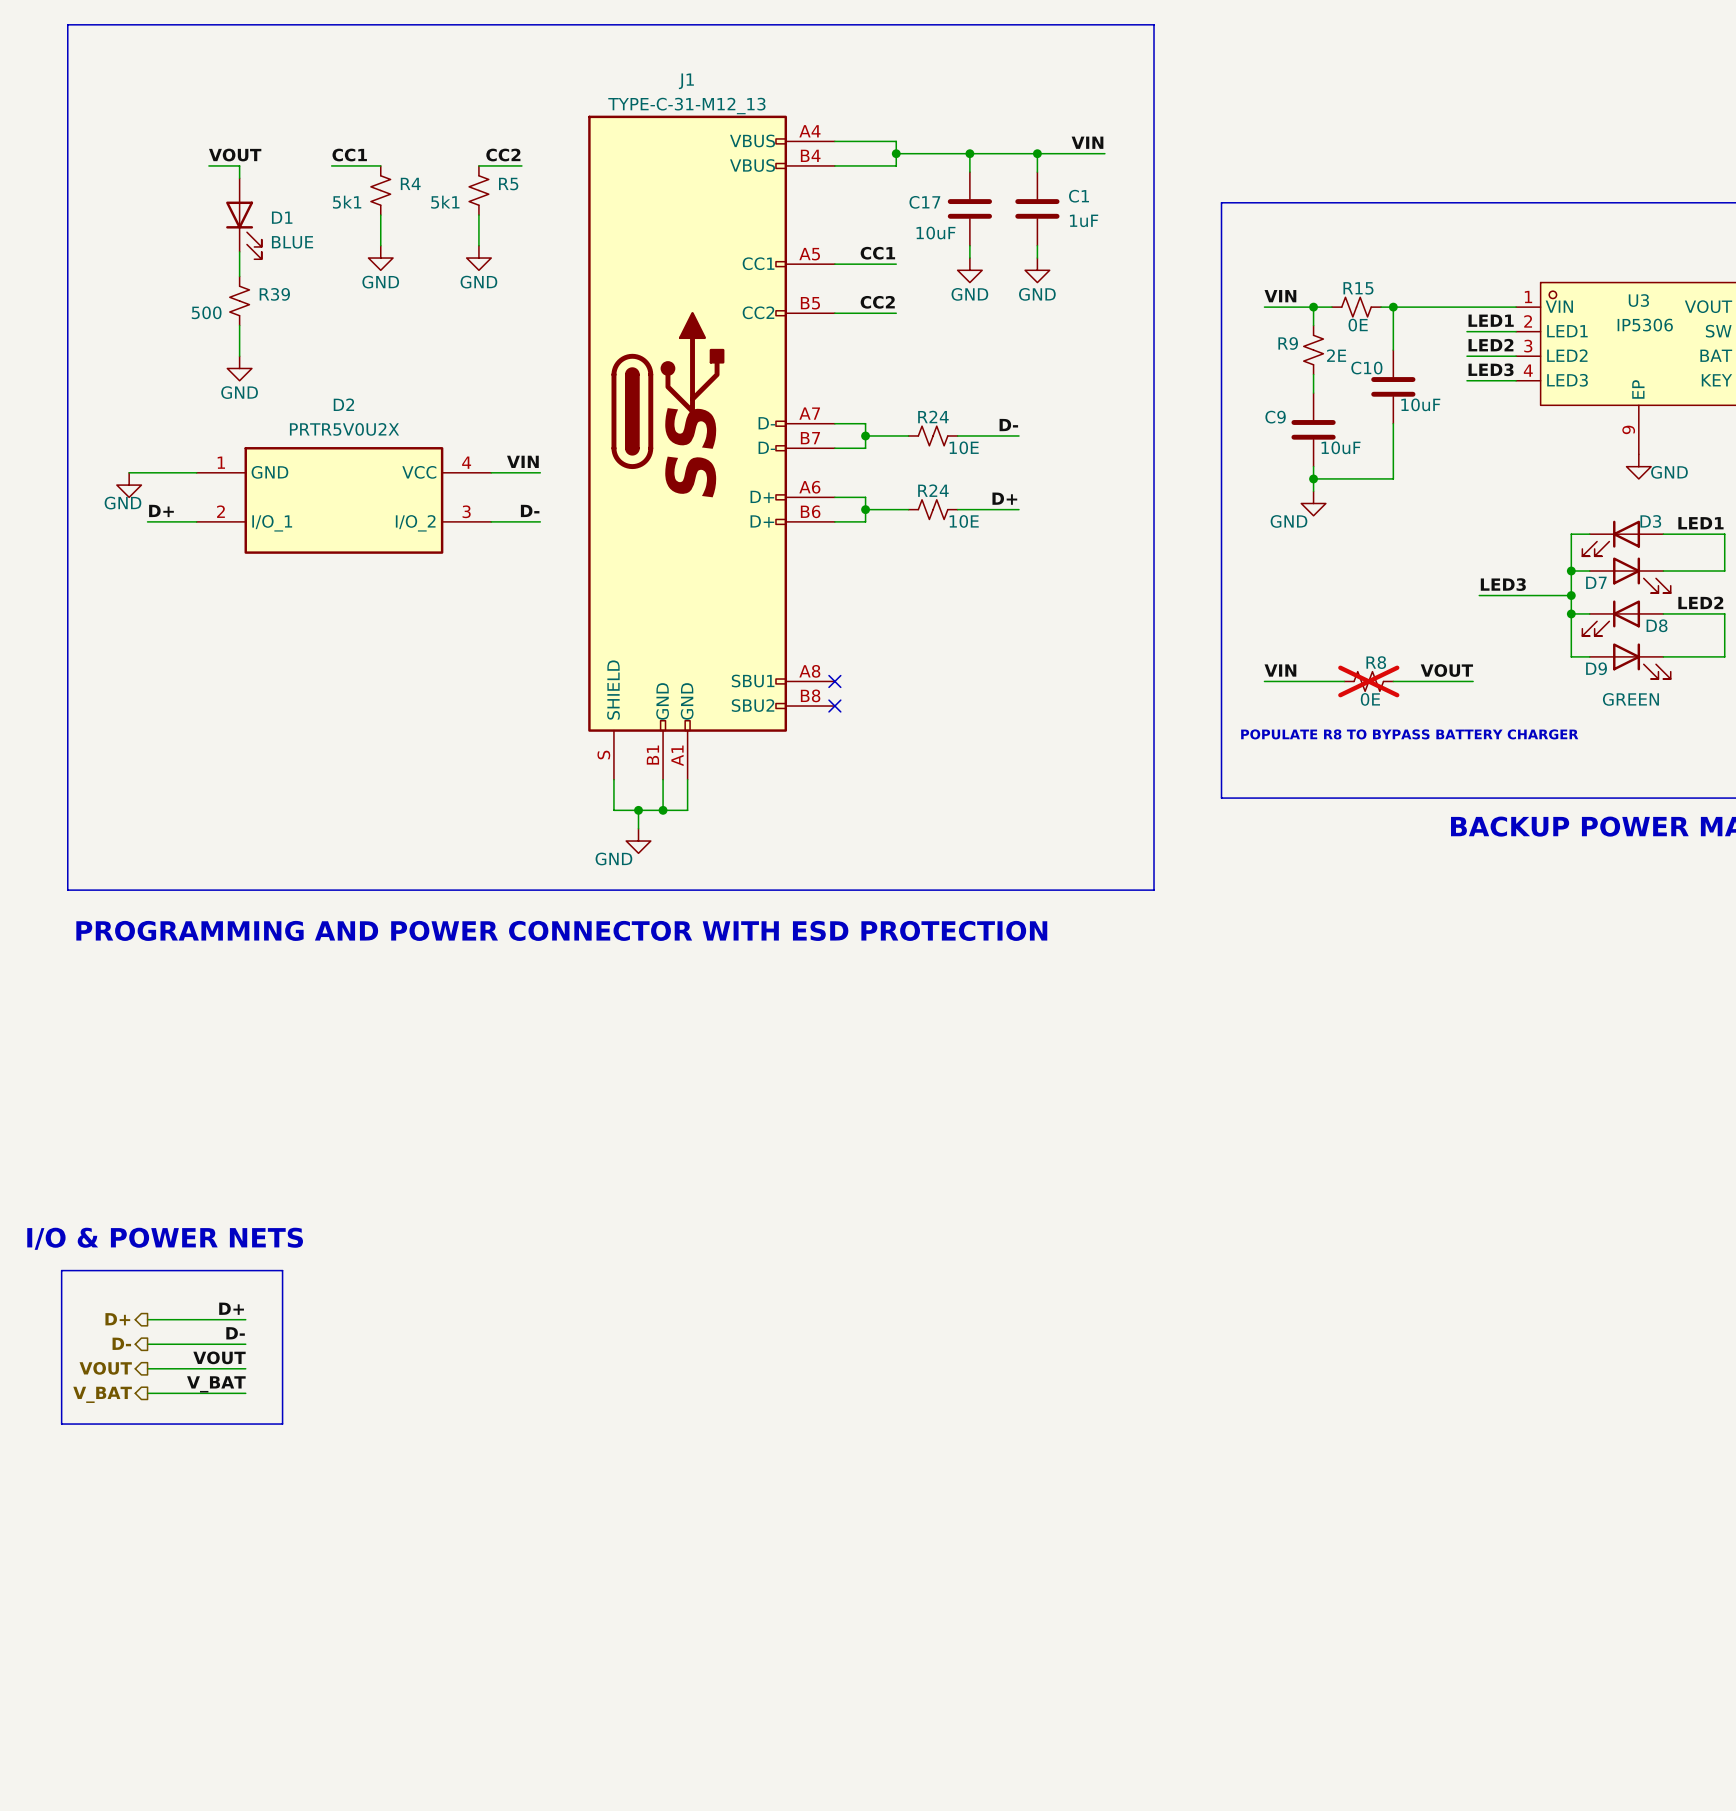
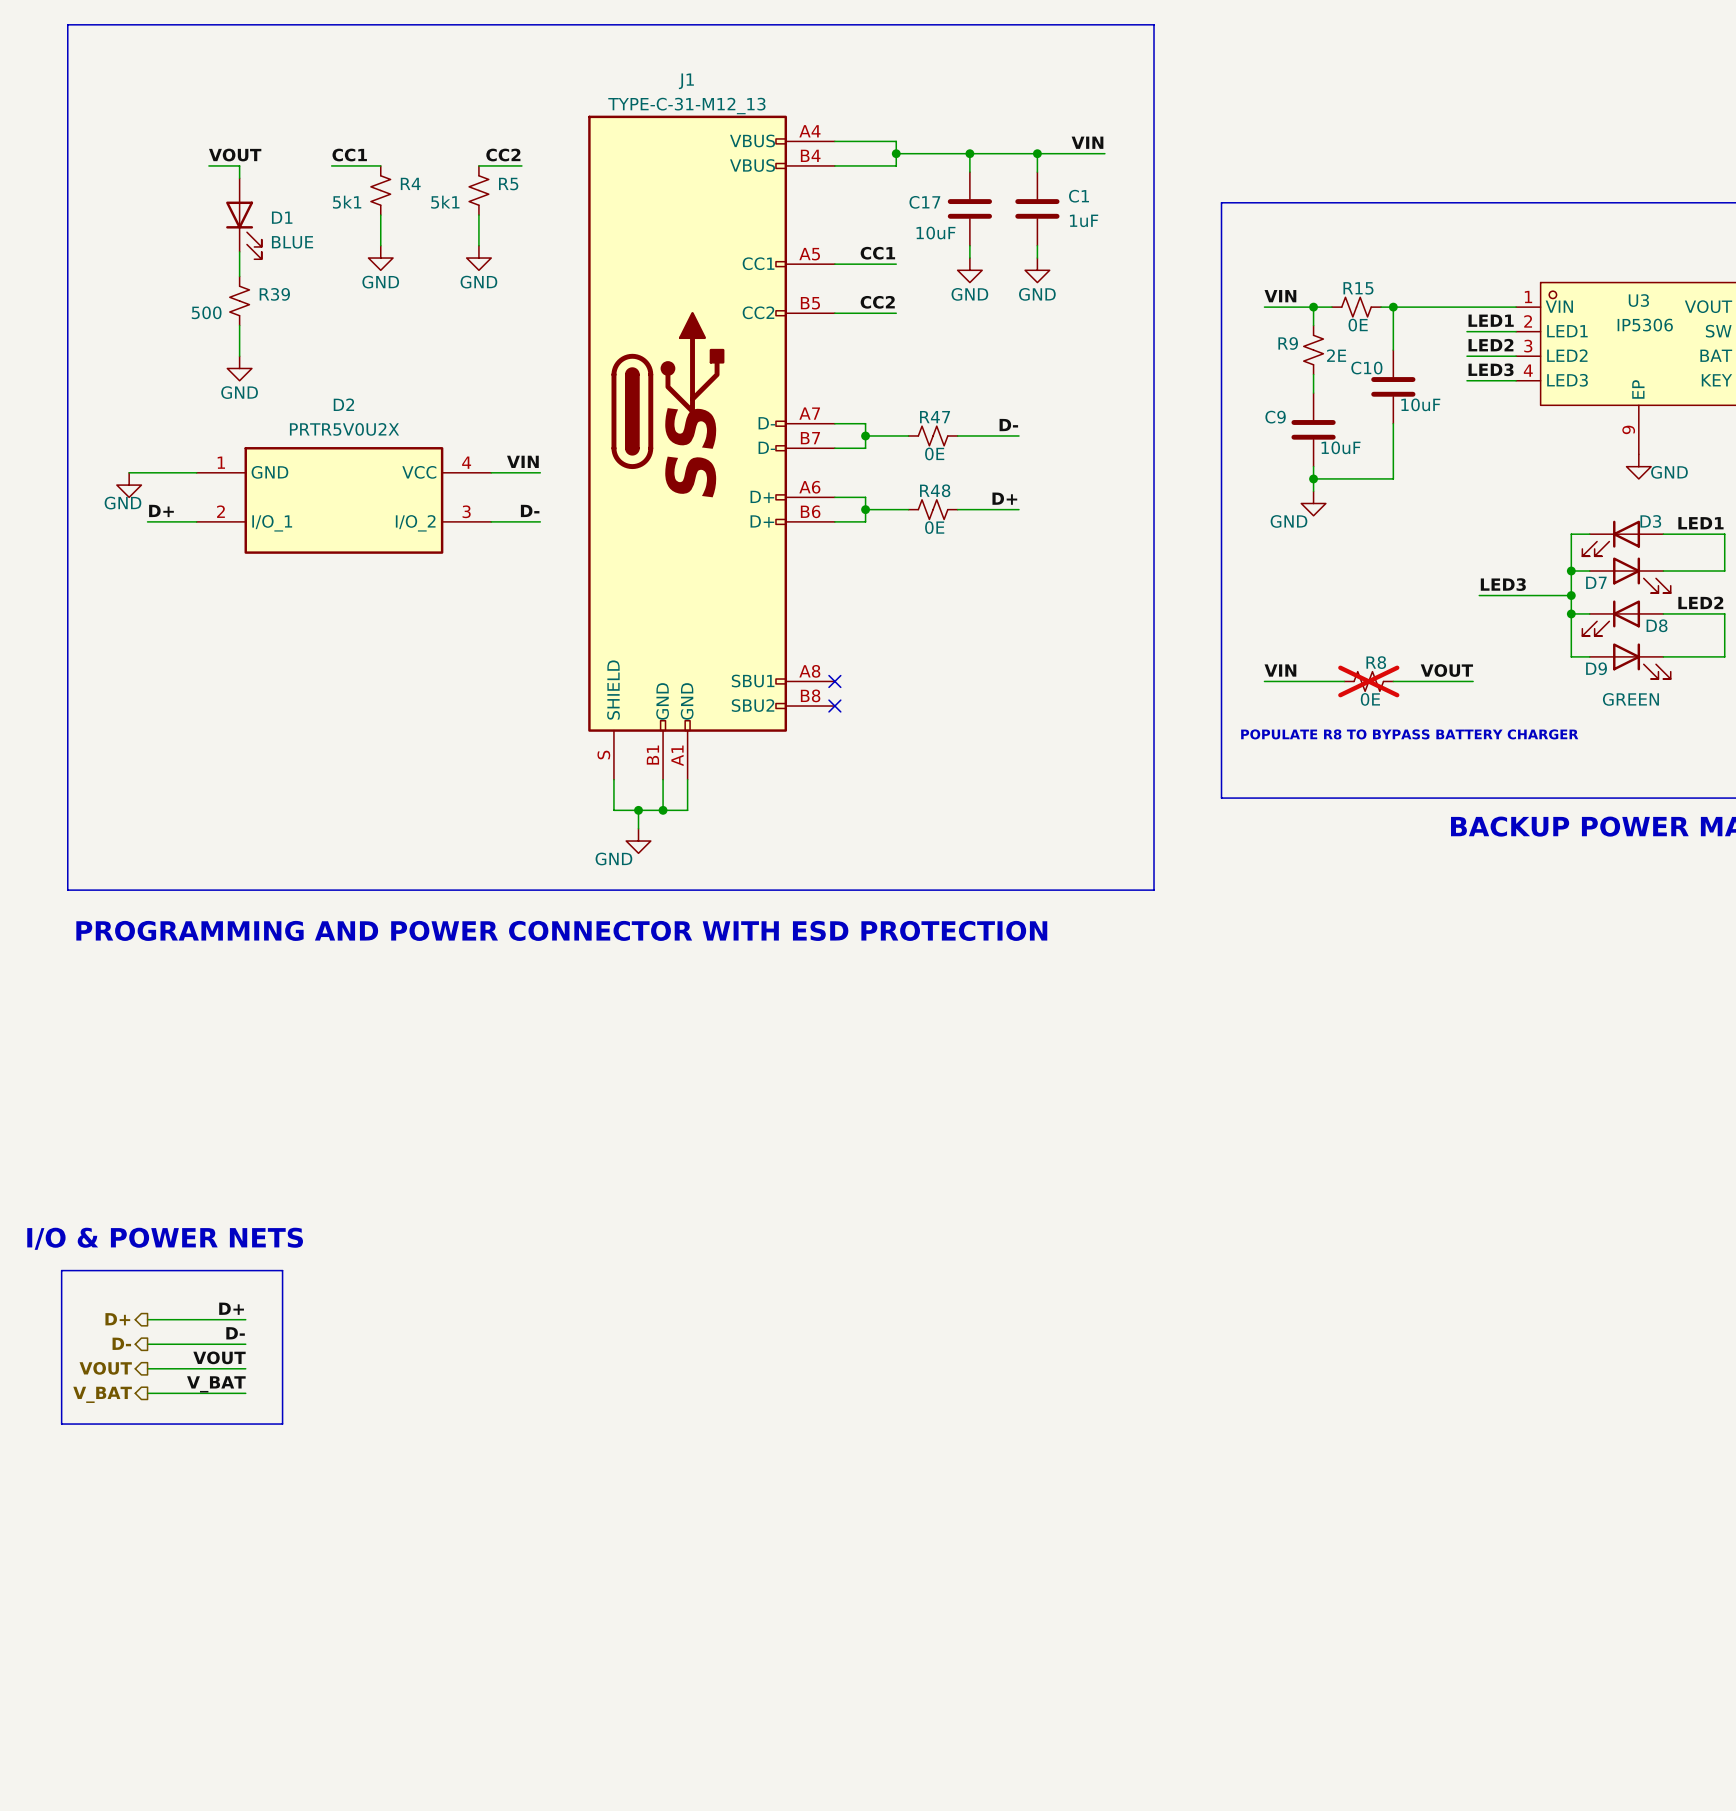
R24 name: R24 (933, 417) -> R47 (935, 417)
R24 value: 10E (964, 447) -> 0E (934, 453)
R24 name: R24 (933, 490) -> R48 (935, 490)
R24 value: 10E (964, 521) -> 0E (934, 527)

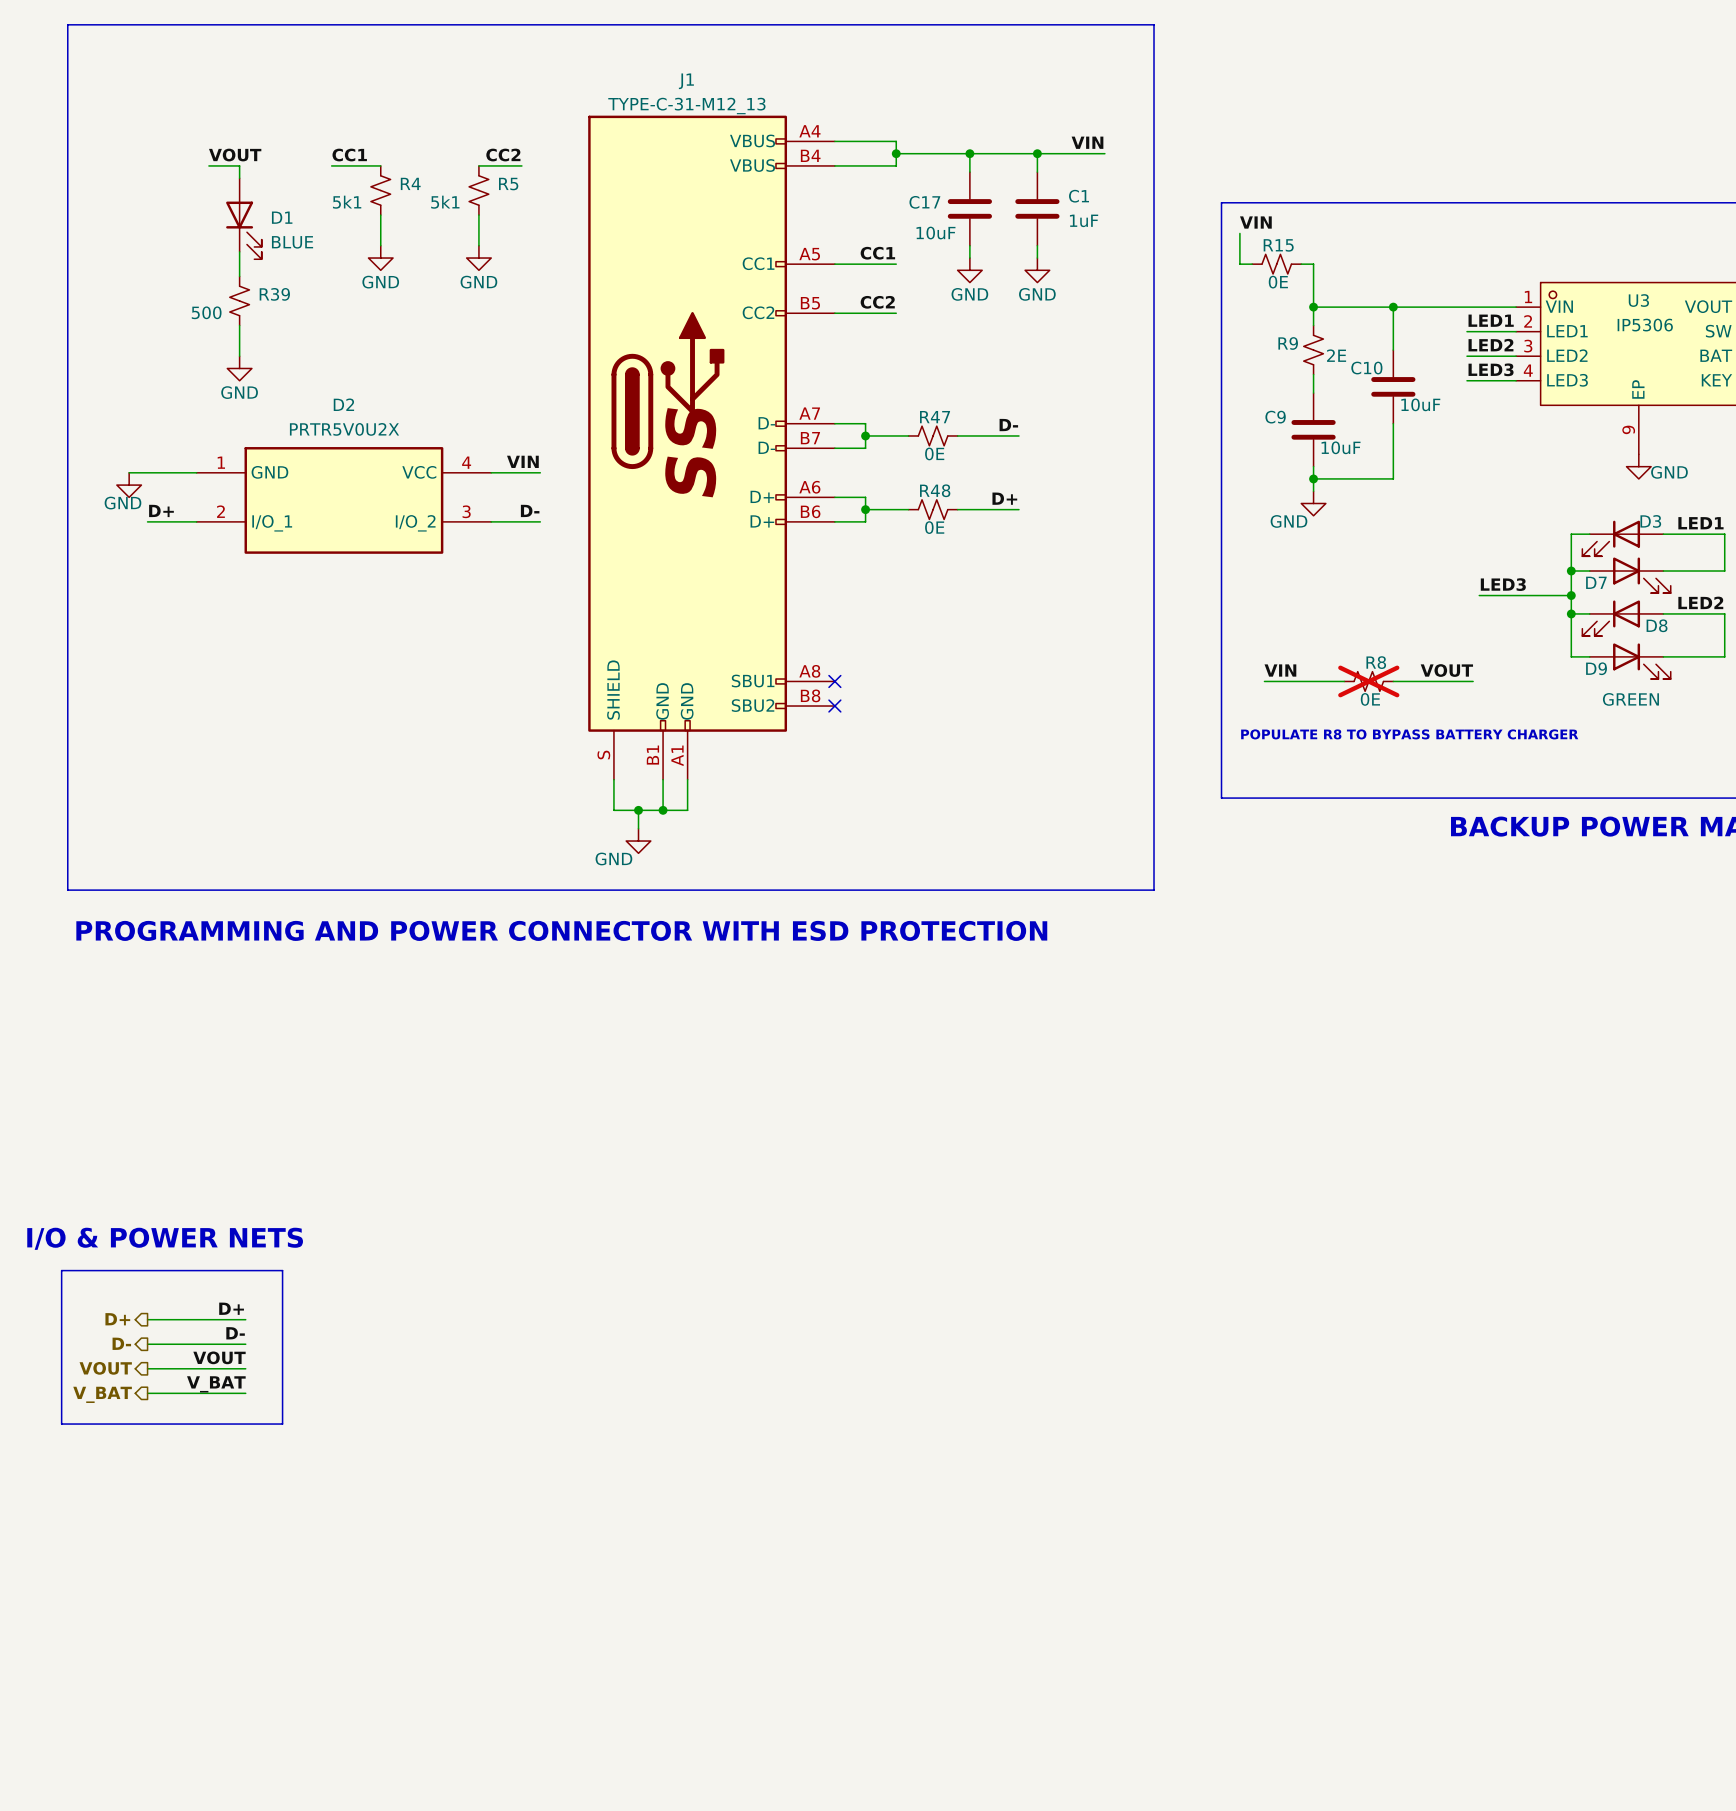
wire: none -> (1239, 233) (1239, 264) (1252, 264)
label position: VIN (1280, 296) -> VIN (1255, 222)
wire: (1264, 307) (1313, 307) -> (1301, 264) (1313, 264) (1313, 307)
R15 position: (1356, 307) -> (1276, 264)

